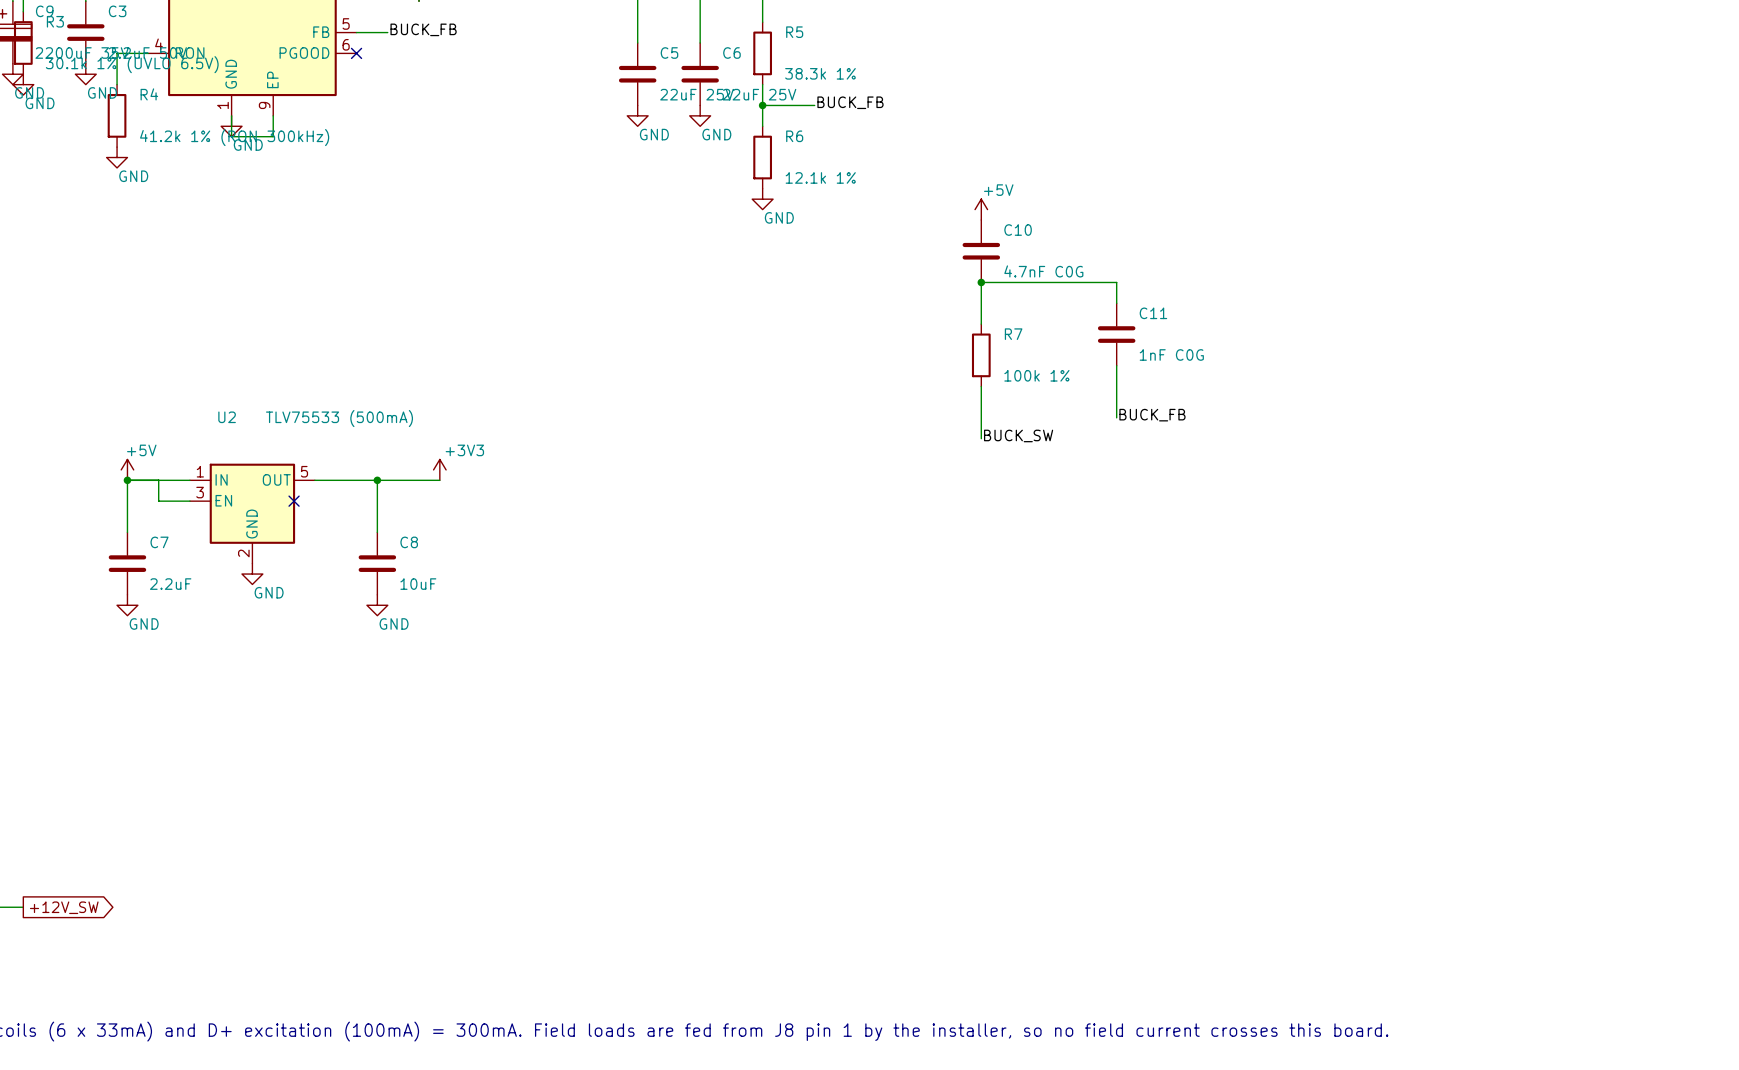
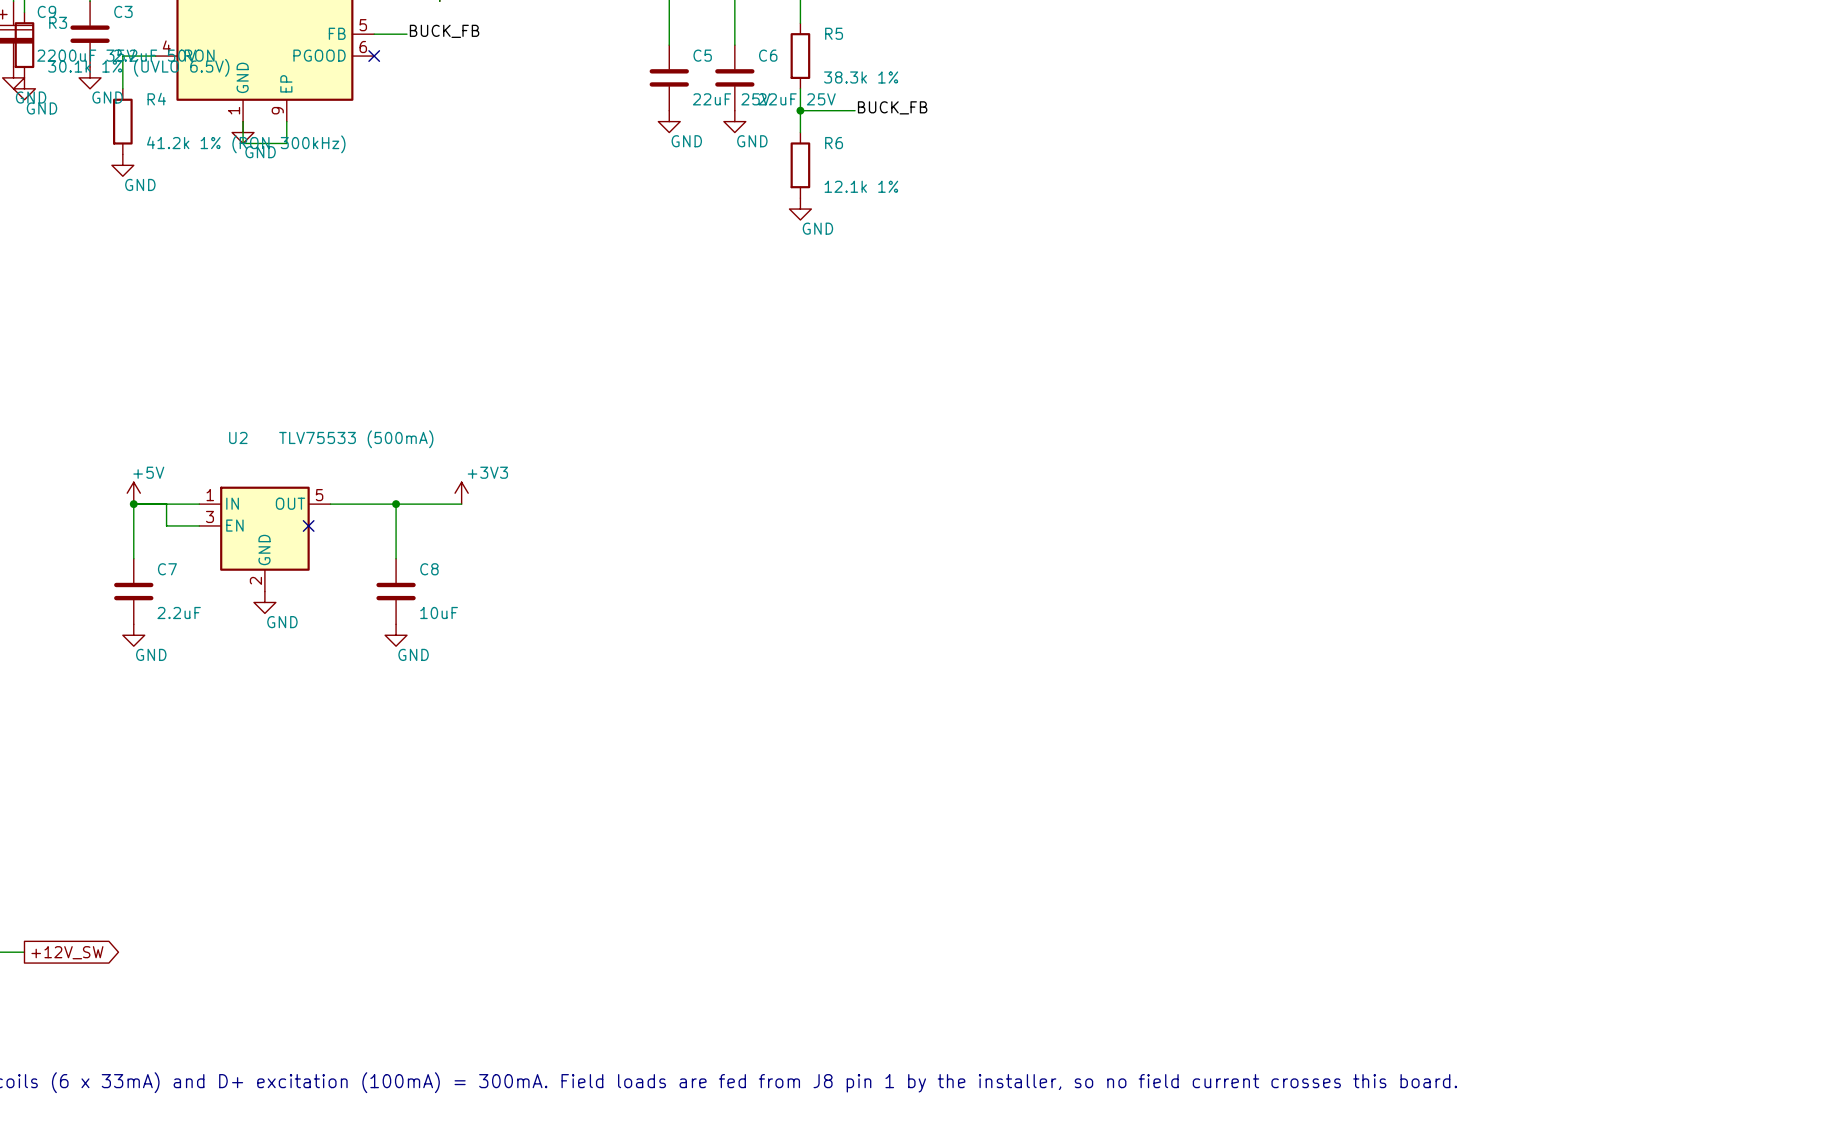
power symbol: +5V (981, 209) -> none
C10: 4.7nF C0G (981, 251) -> none
junction: (981, 282) -> none
wire: (1116, 303) (1116, 282) (981, 282) (981, 324) -> none
C11: 1nF C0G (1116, 334) -> none
R7: 100k 1% (981, 355) -> none
wire: (1116, 365) (1116, 417) -> none
wire: (981, 386) (981, 438) -> none
label: BUCK_FB (1152, 415) -> none
label: BUCK_SW (1018, 435) -> none

